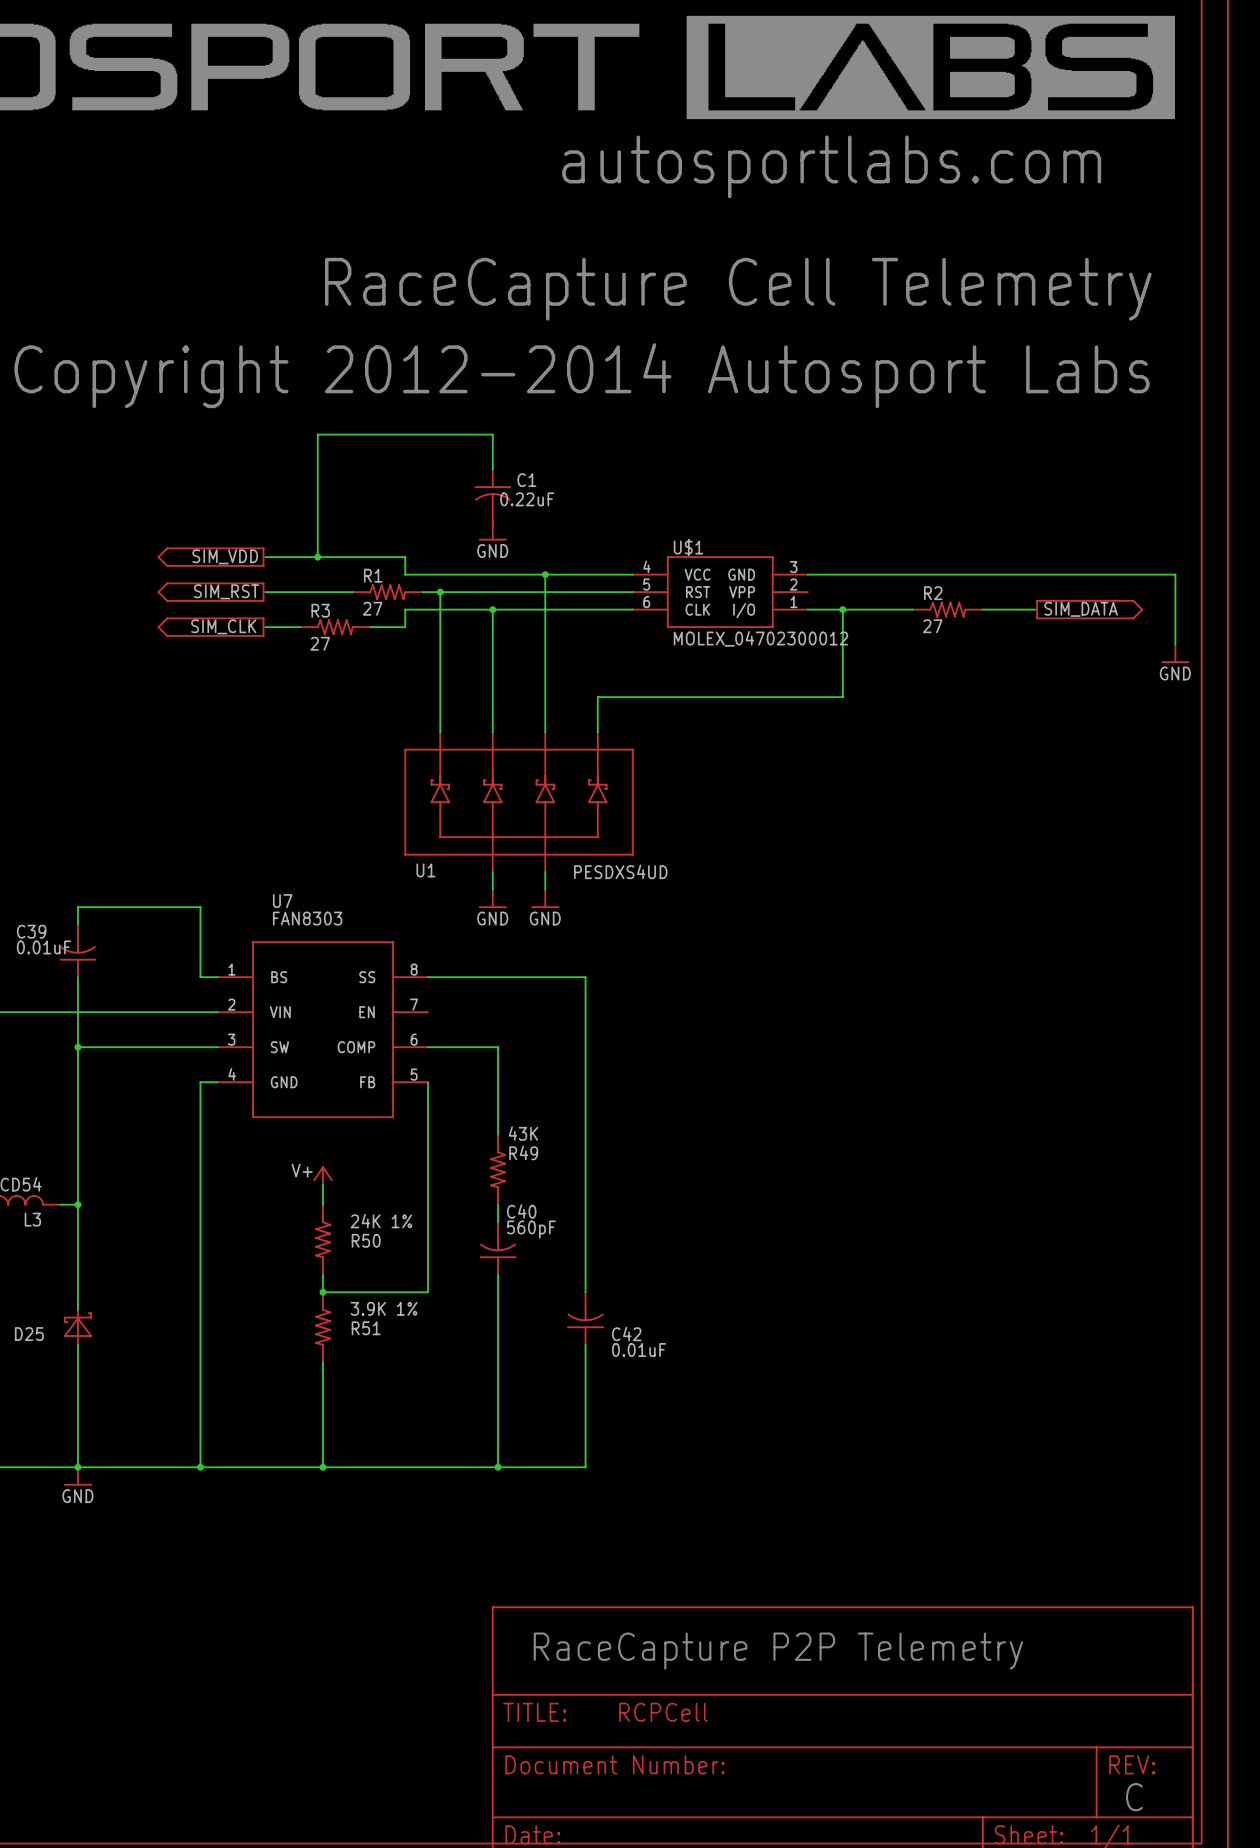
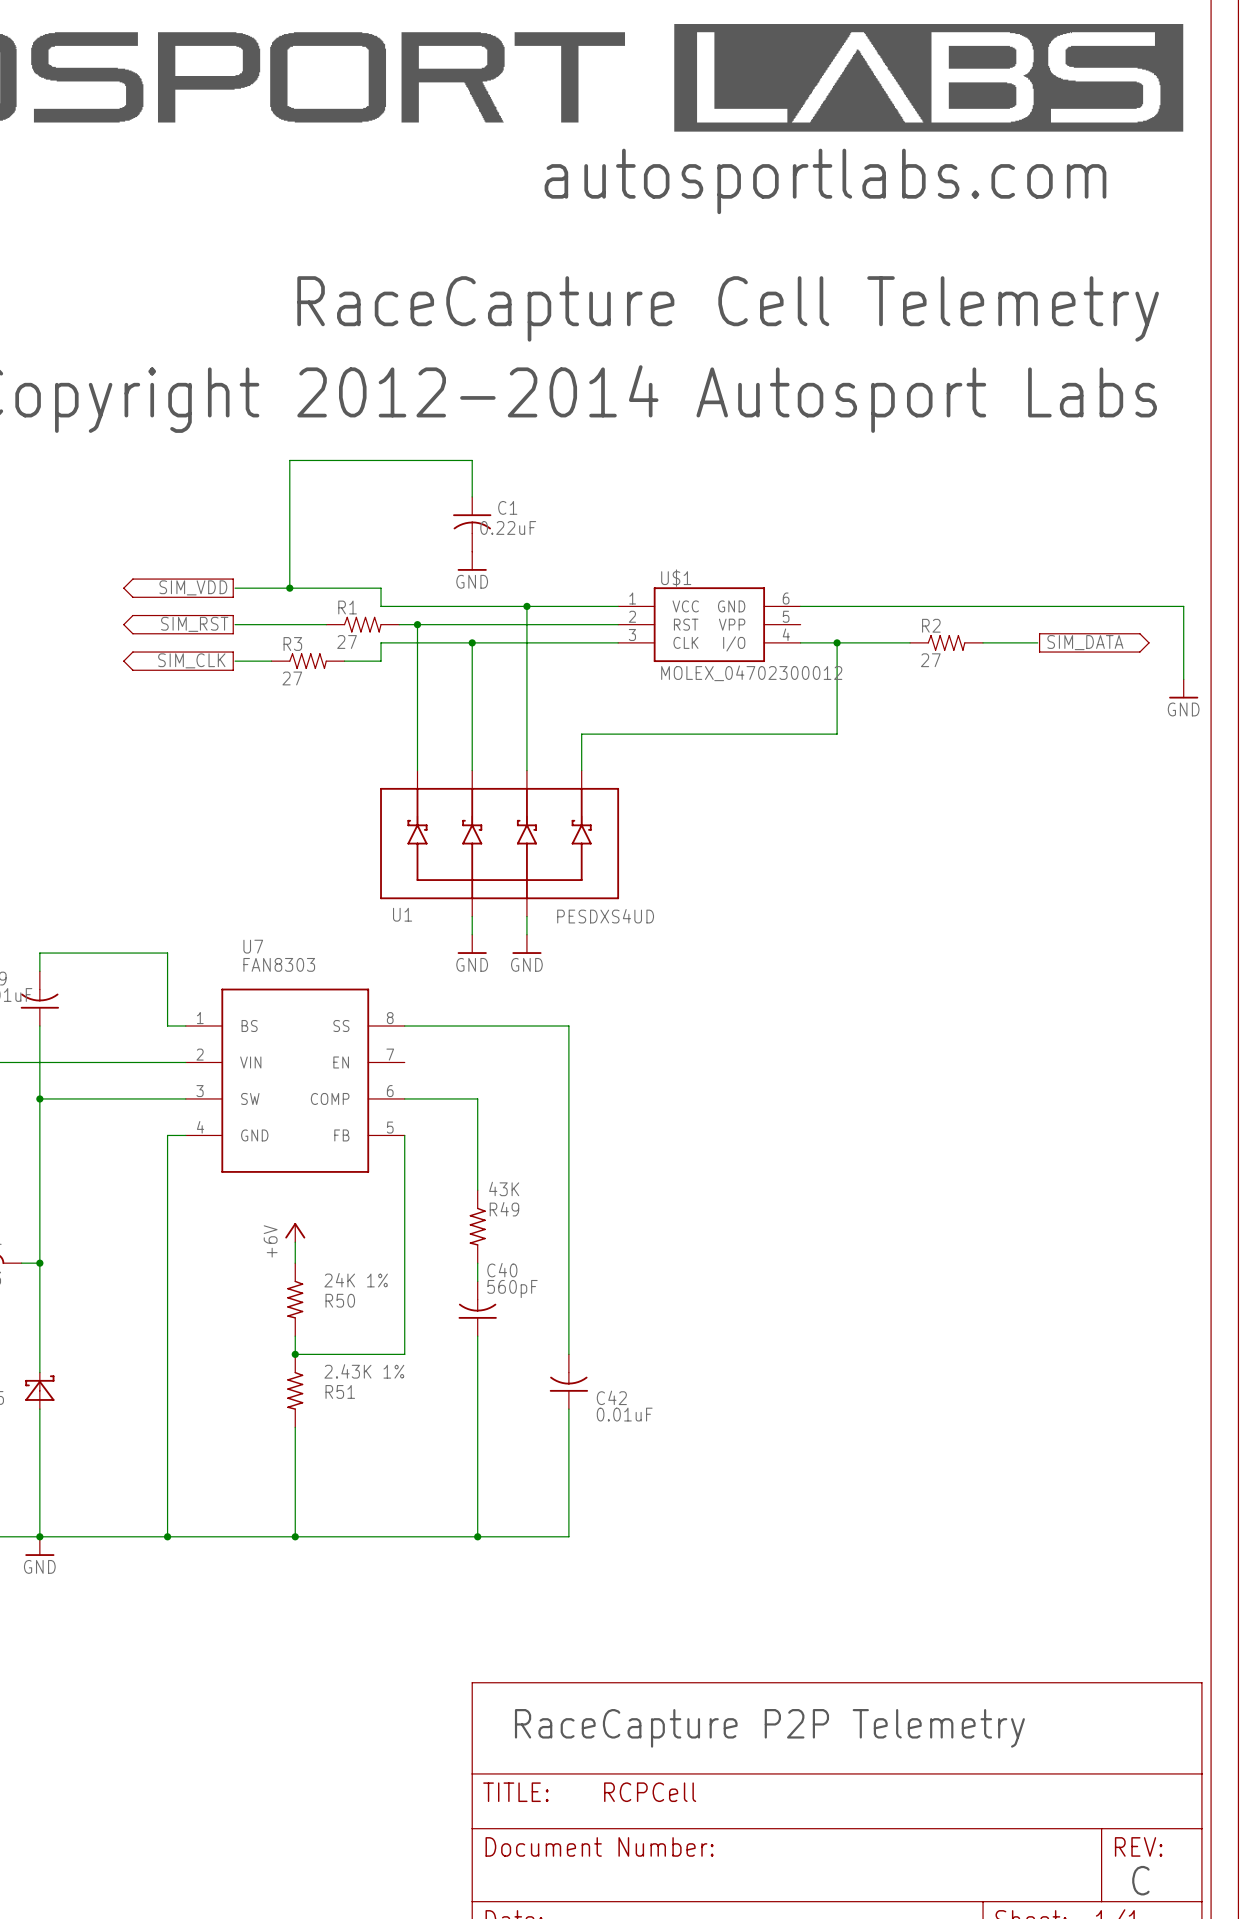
U$1 pin number: 4 (646, 566) -> 1 (632, 598)
U$1 pin number: 3 (793, 567) -> 6 (786, 598)
U$1 pin number: 5 (646, 584) -> 2 (632, 616)
U$1 pin number: 2 (793, 584) -> 5 (786, 616)
U$1 pin number: 6 (646, 602) -> 3 (632, 634)
U$1 pin number: 1 (793, 602) -> 4 (786, 634)
power symbol: V+ (323, 1175) -> +6V (295, 1232)
R51 value: 3.9K 1% (384, 1308) -> 2.43K 1% (364, 1371)

